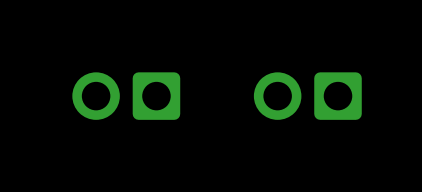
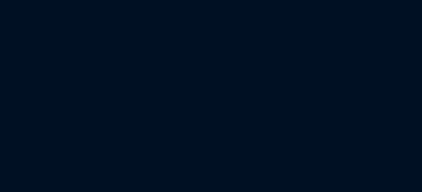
part: (126, 96) -> none
part: (307, 96) -> none

